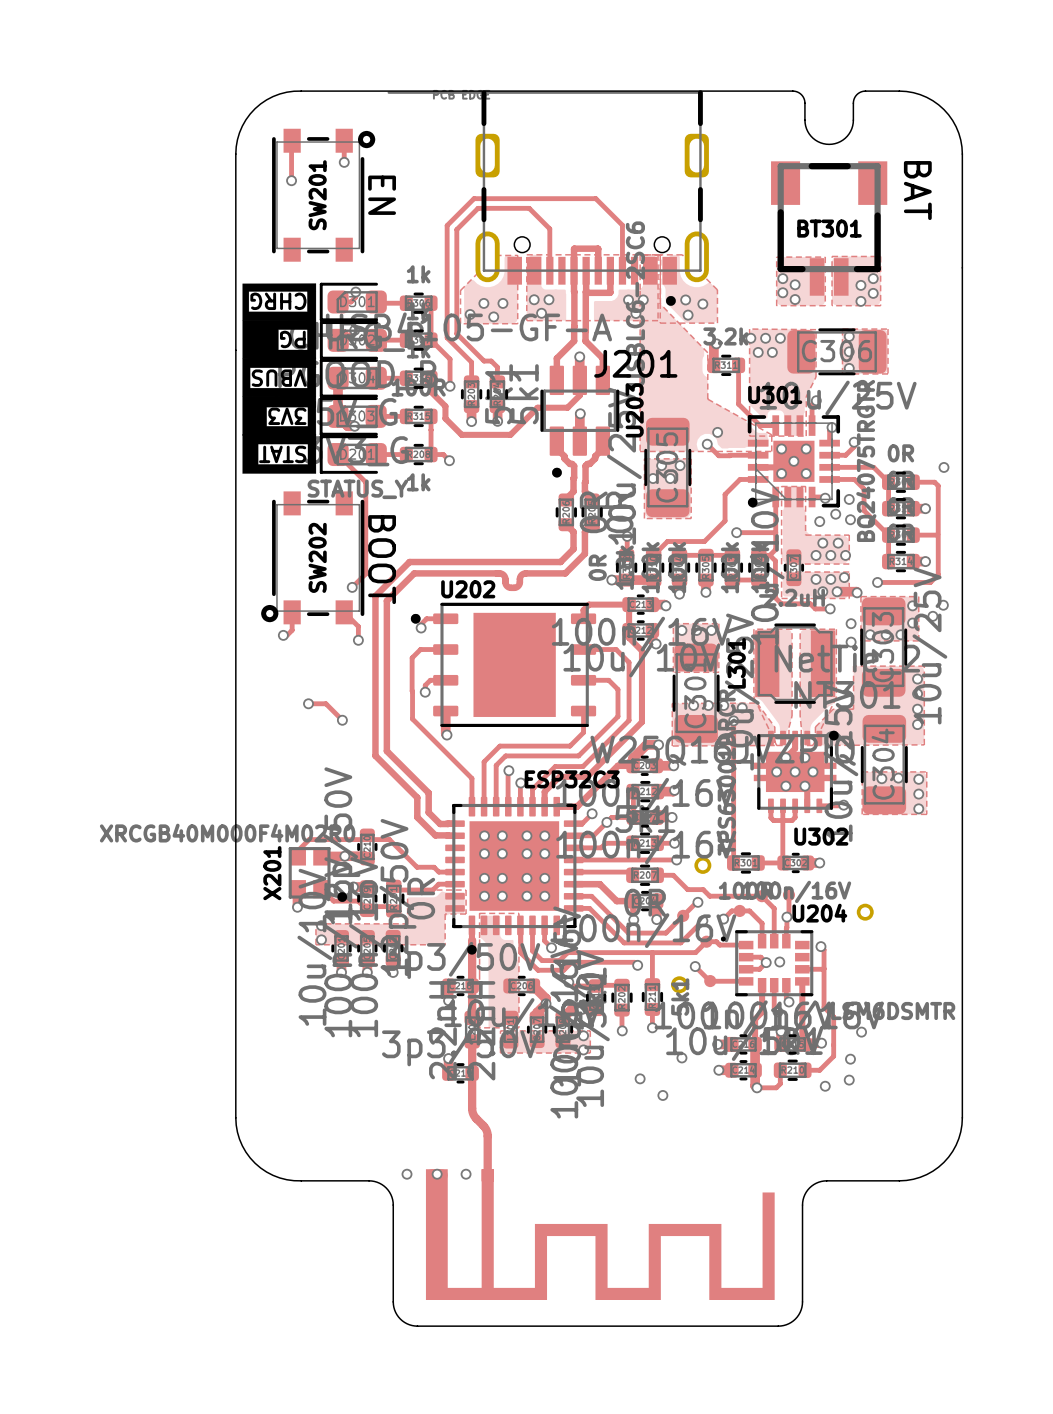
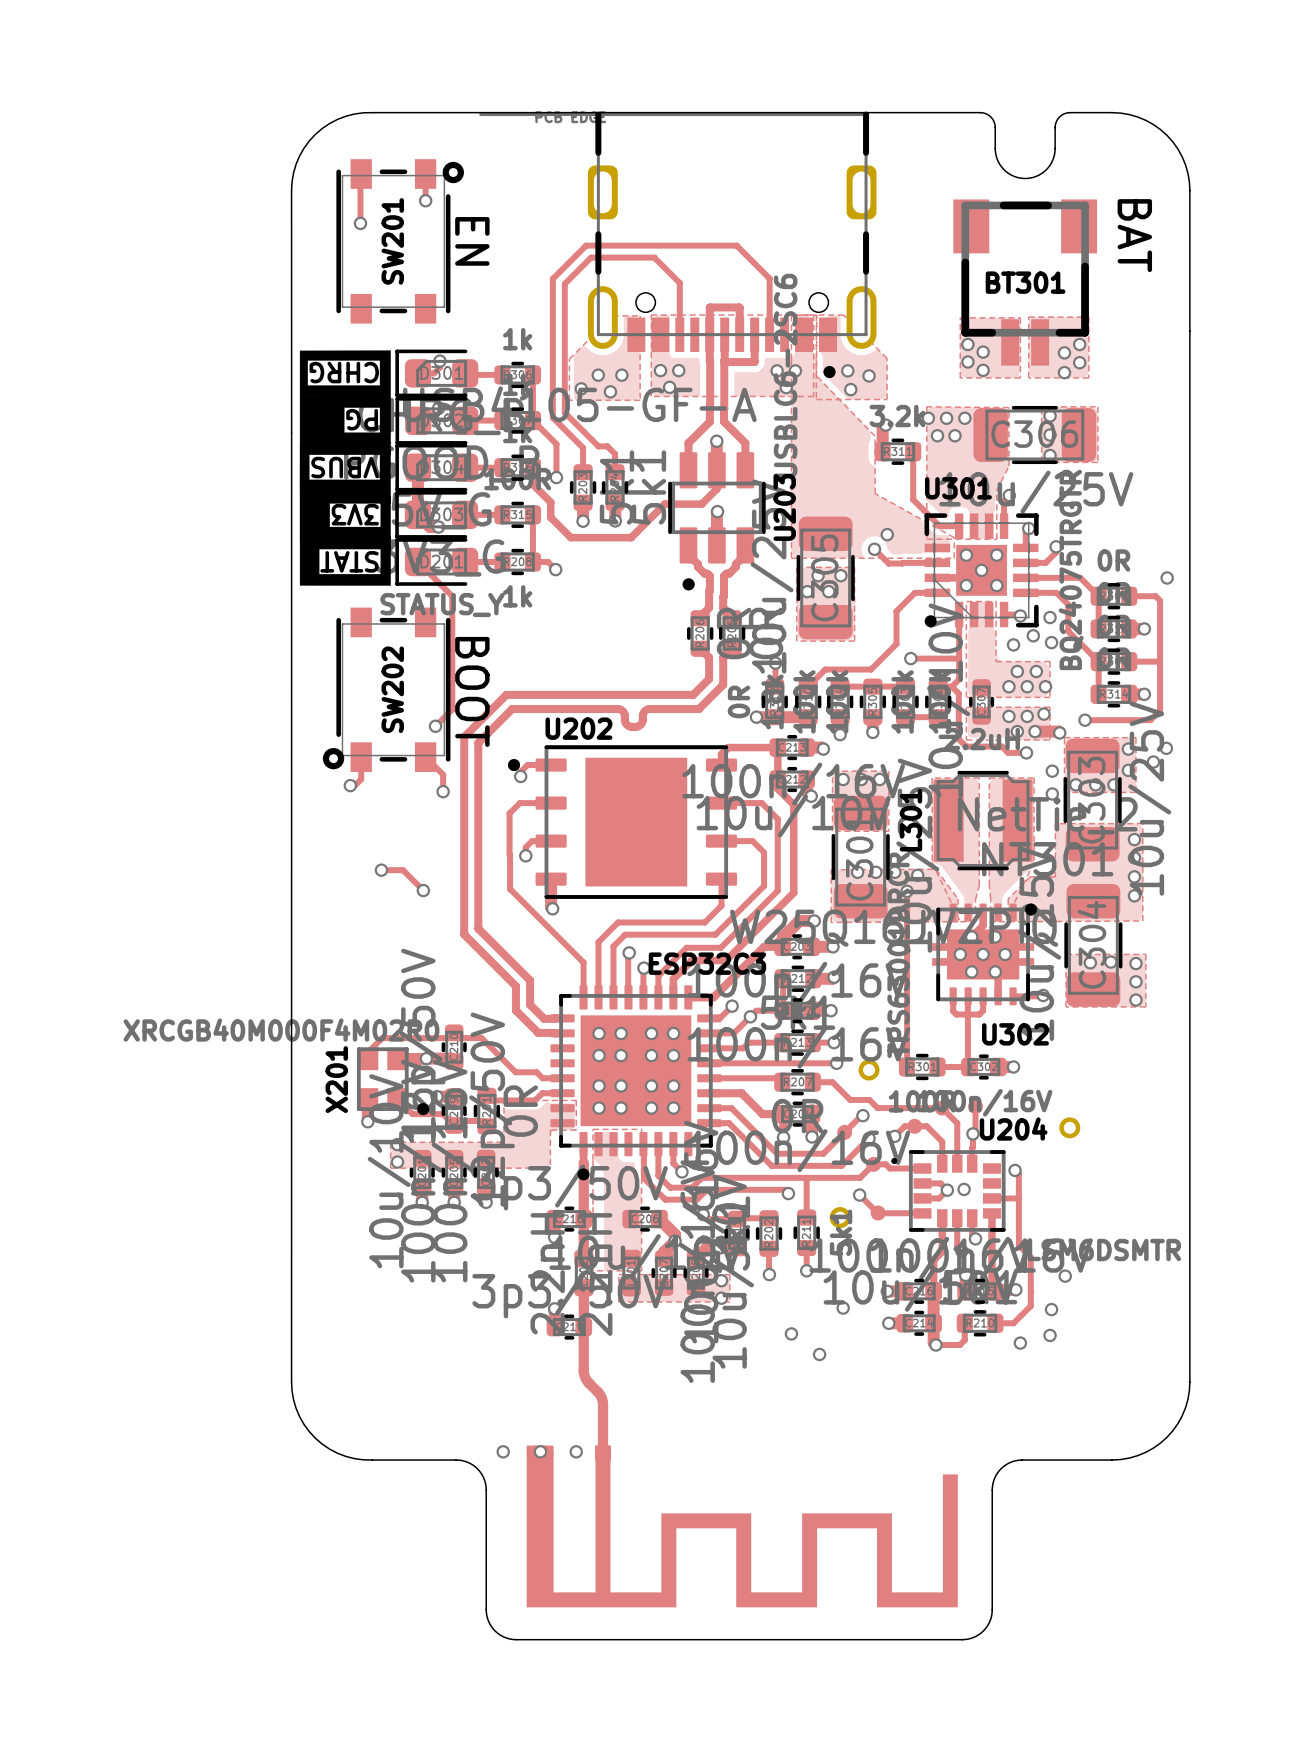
J201 name: J201 (635, 363) -> none

